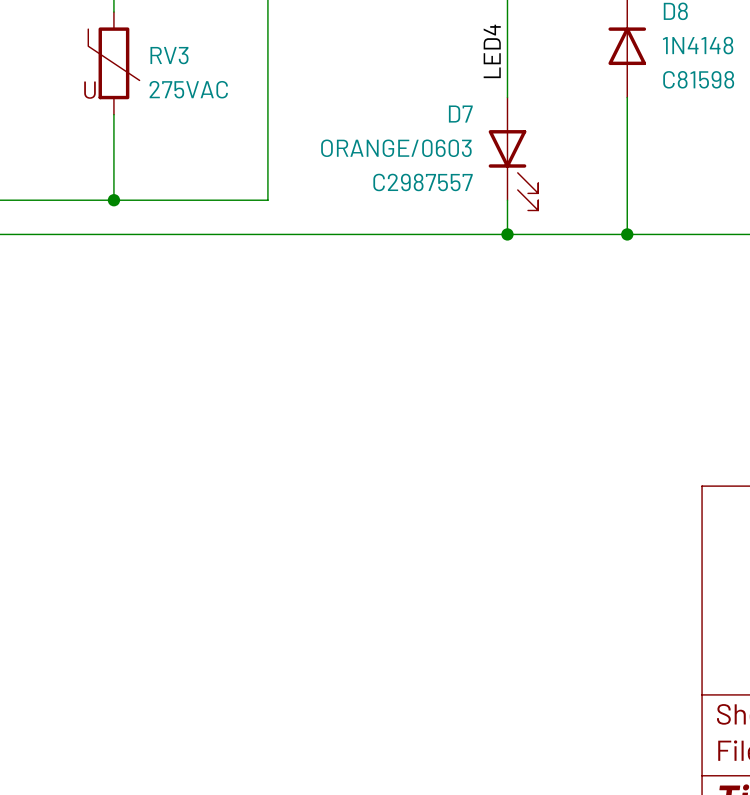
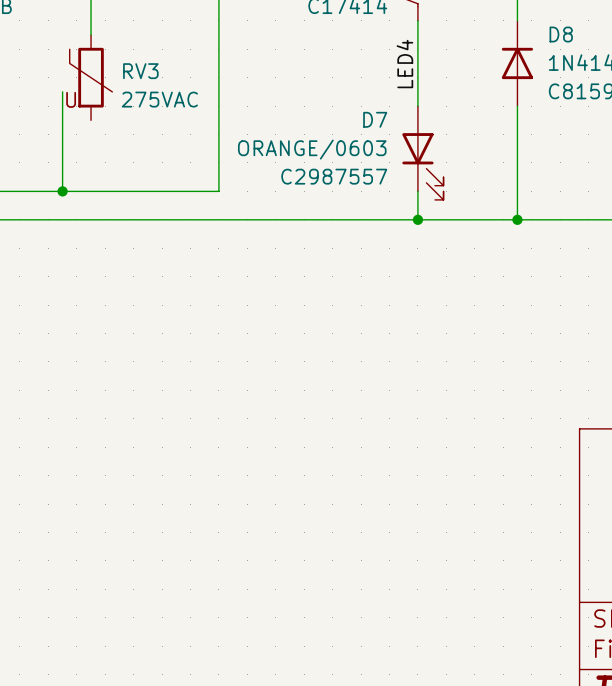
wire: none -> (62, 91) (62, 191)
wire: (113, 114) (113, 200) -> none
junction position: (113, 200) -> (62, 191)

